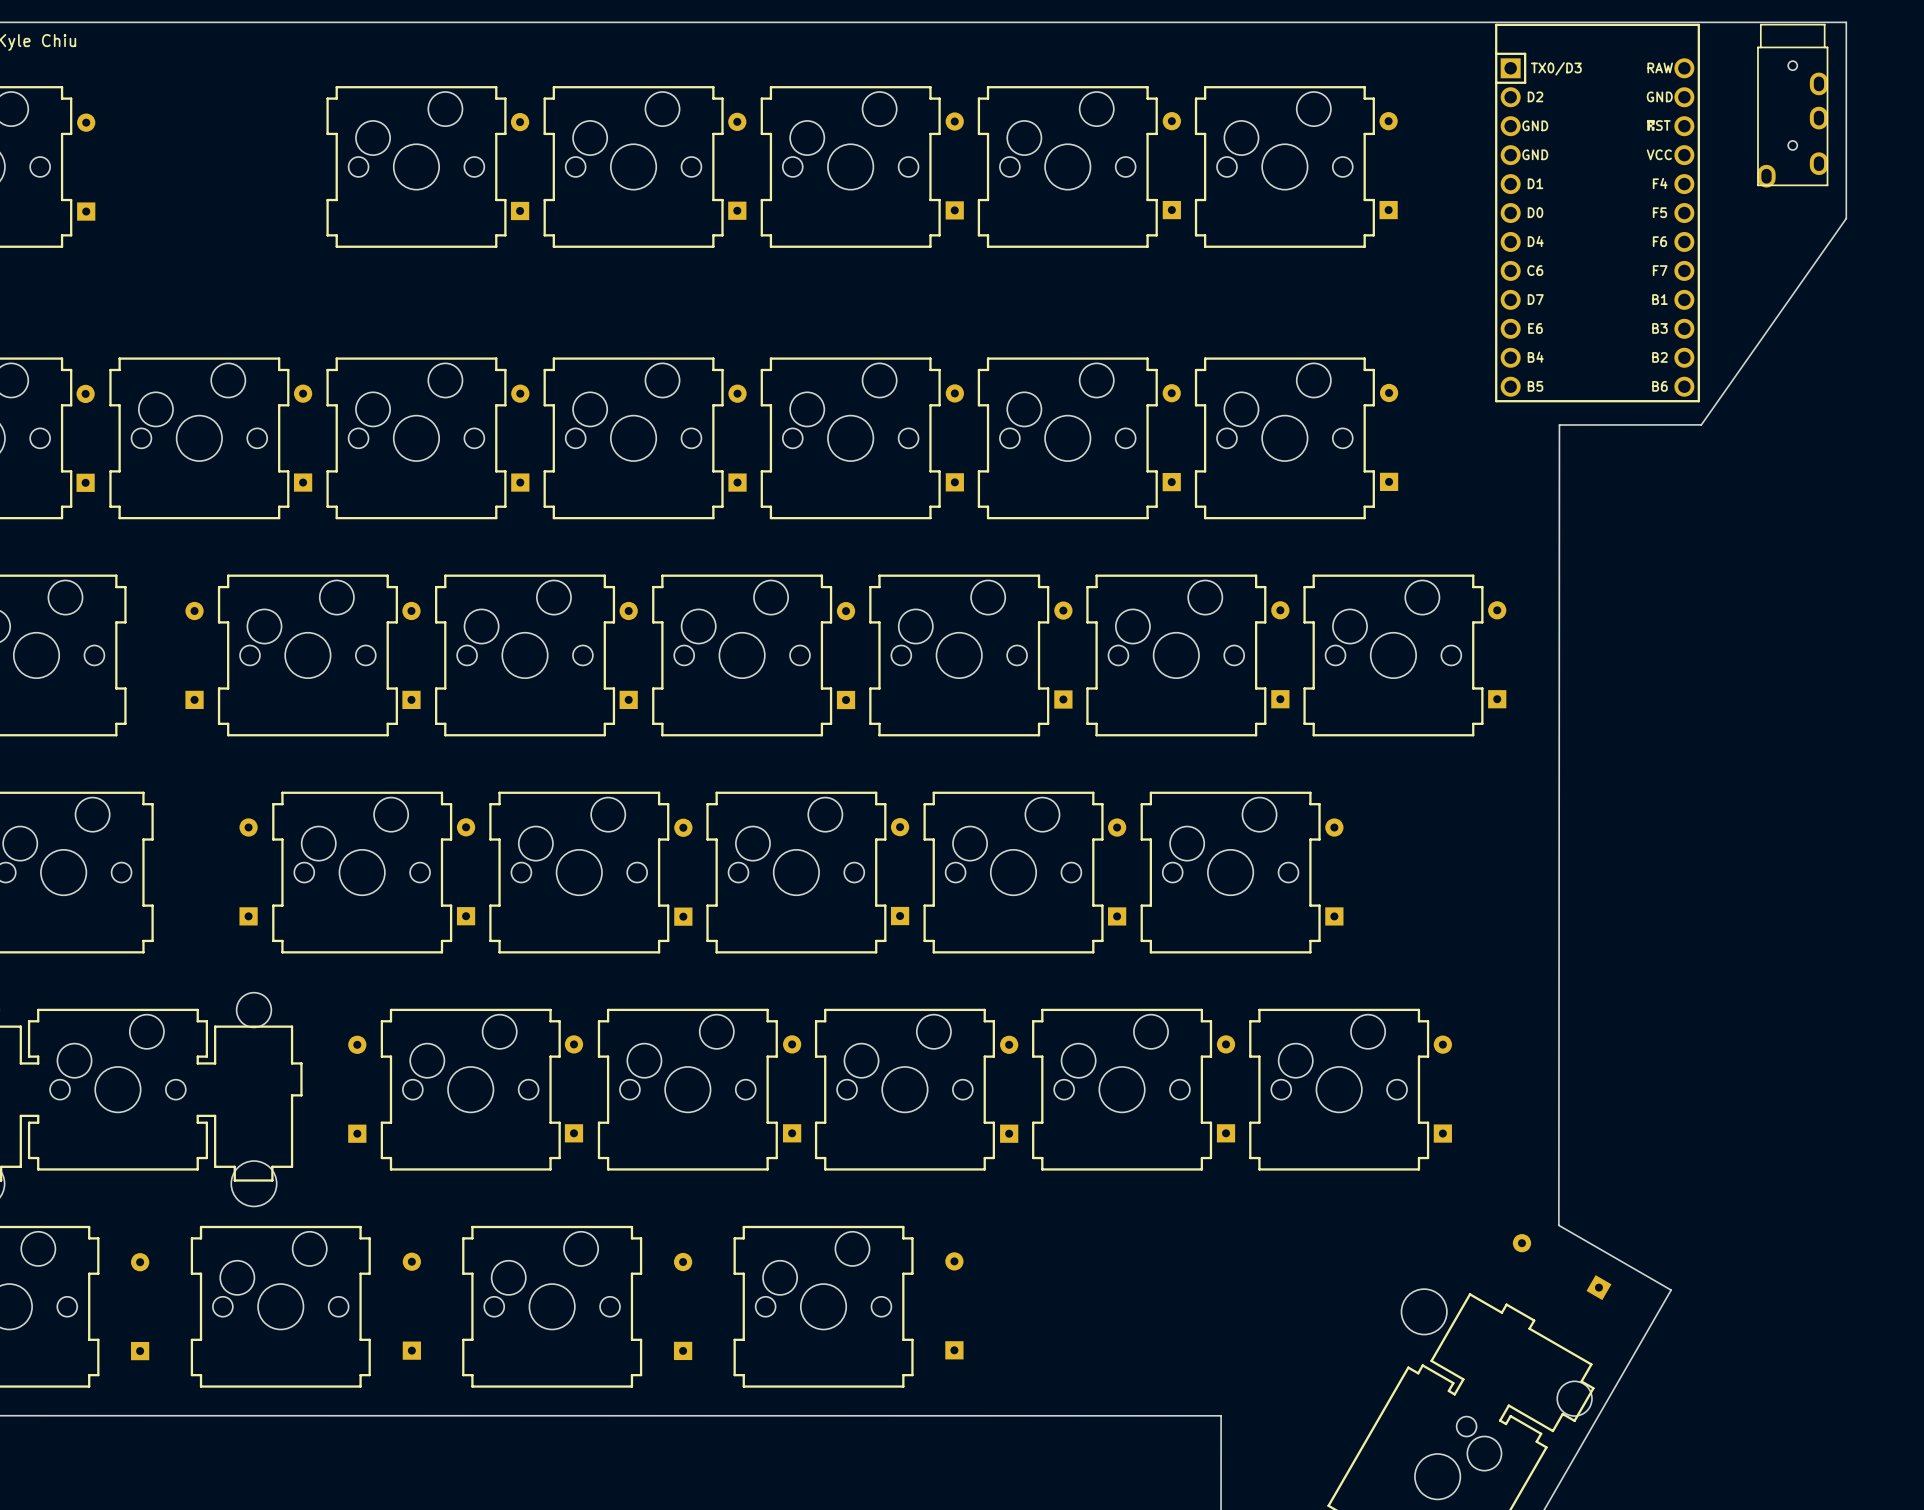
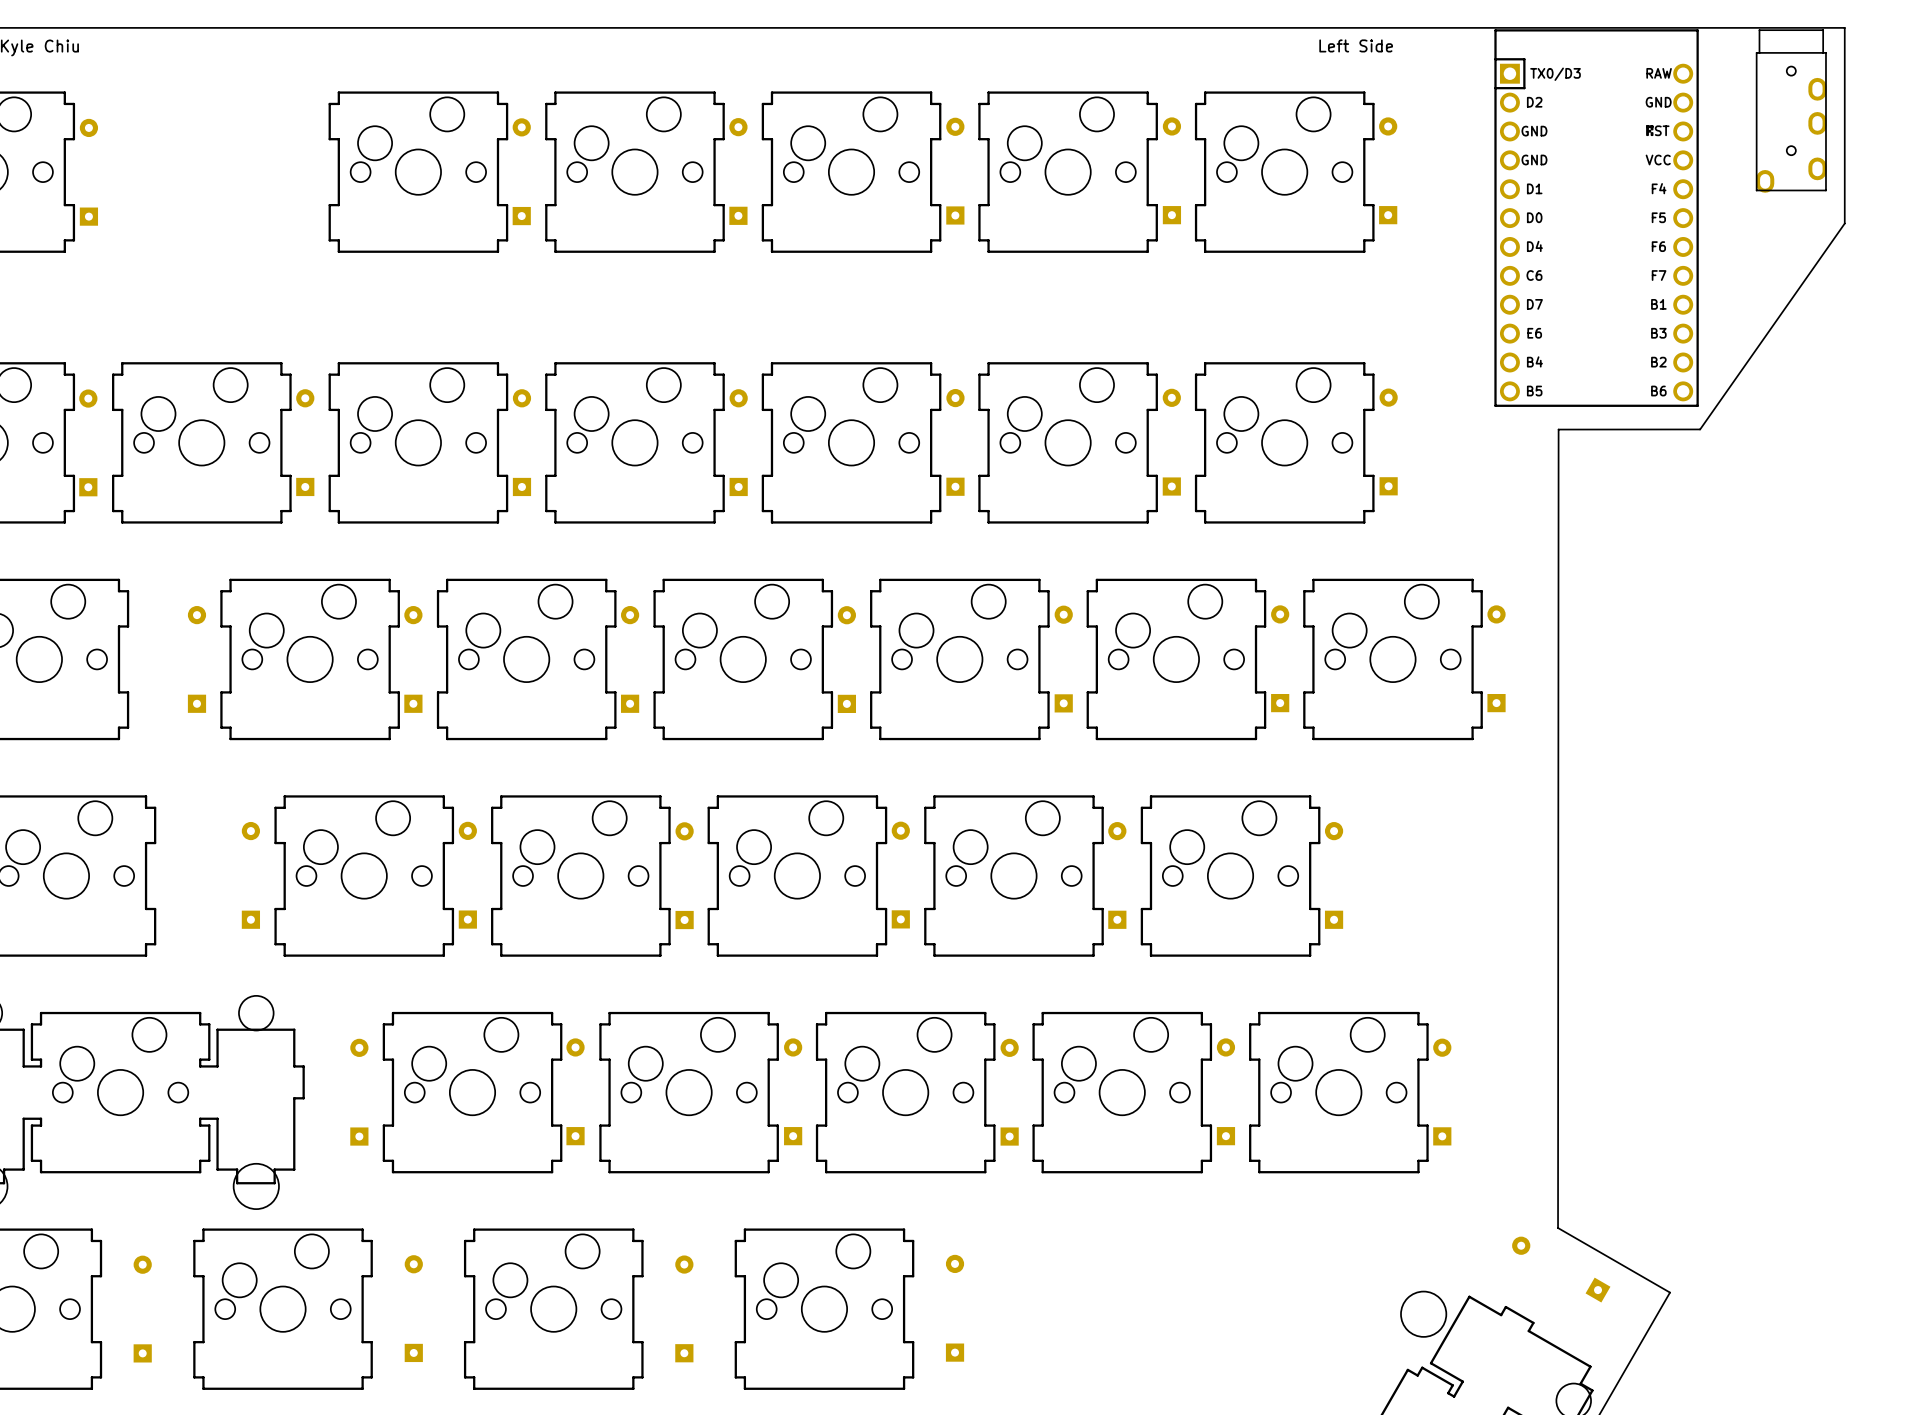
text: none -> Left Side (1356, 45)

